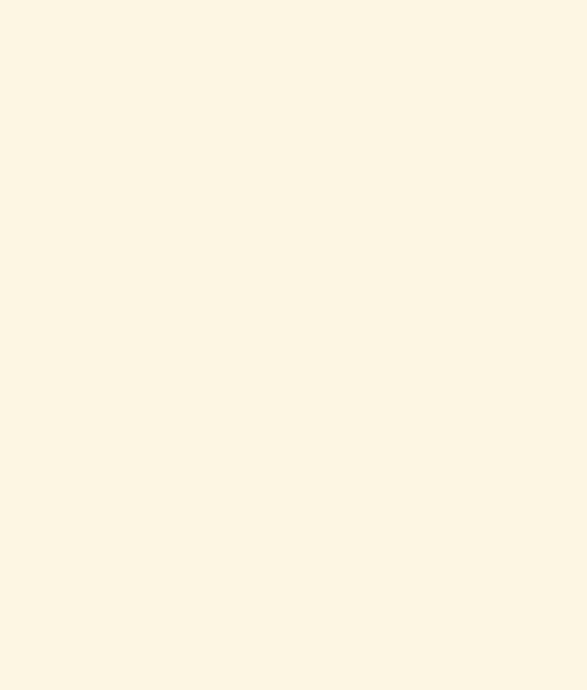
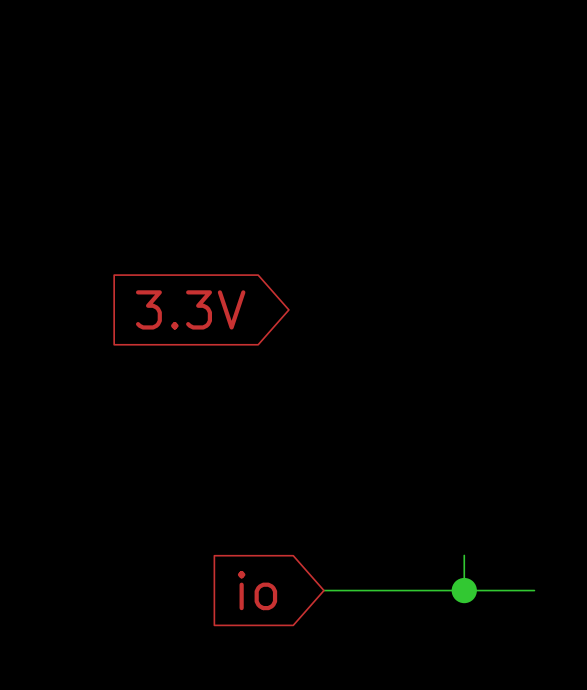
global label: none -> 3.3V (190, 309)
wire: none -> (464, 555) (464, 590)
global label: none -> io (257, 590)
wire: none -> (323, 590) (534, 590)
junction: none -> (464, 590)

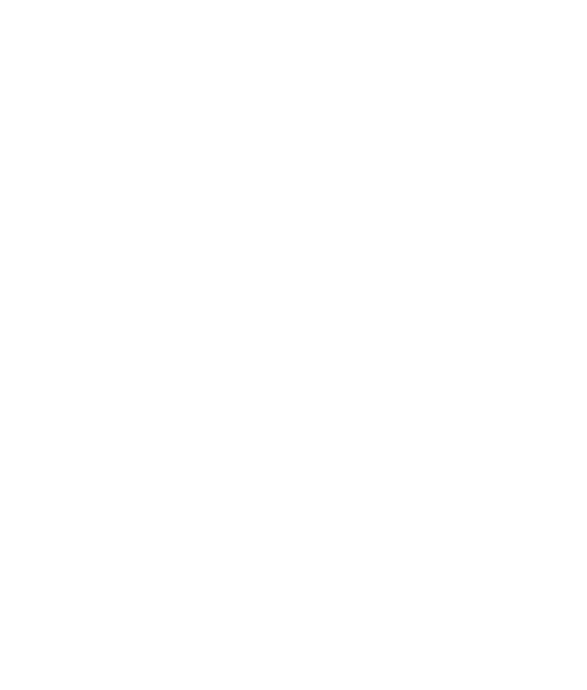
global label: 3.3V (190, 309) -> none
wire: (464, 555) (464, 590) -> none
global label: io (257, 590) -> none
wire: (323, 590) (534, 590) -> none
junction: (464, 590) -> none

